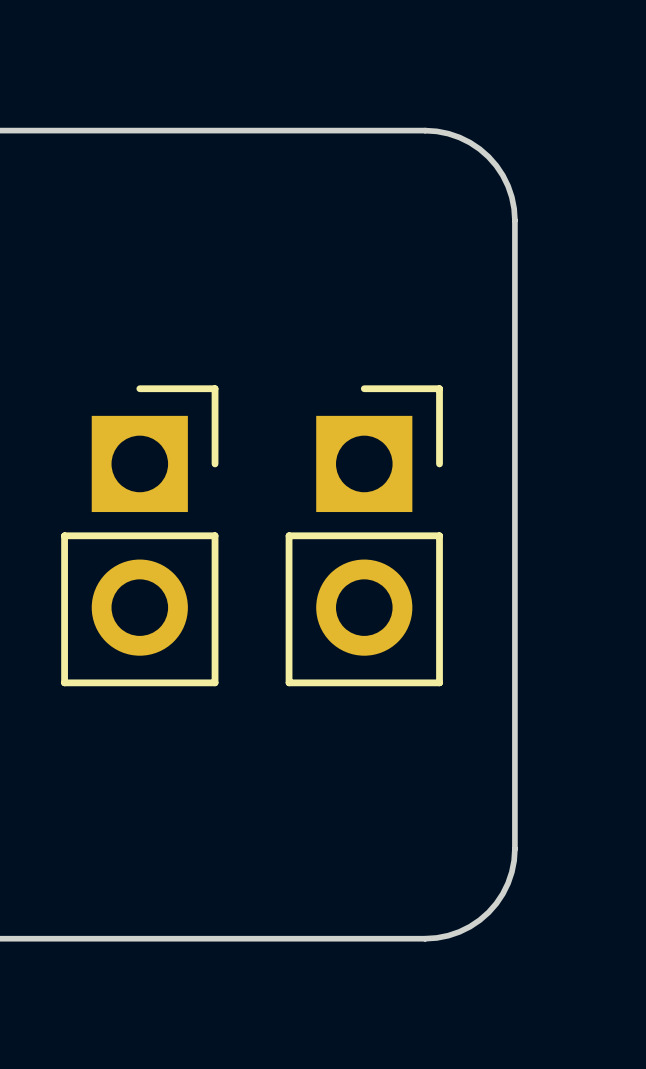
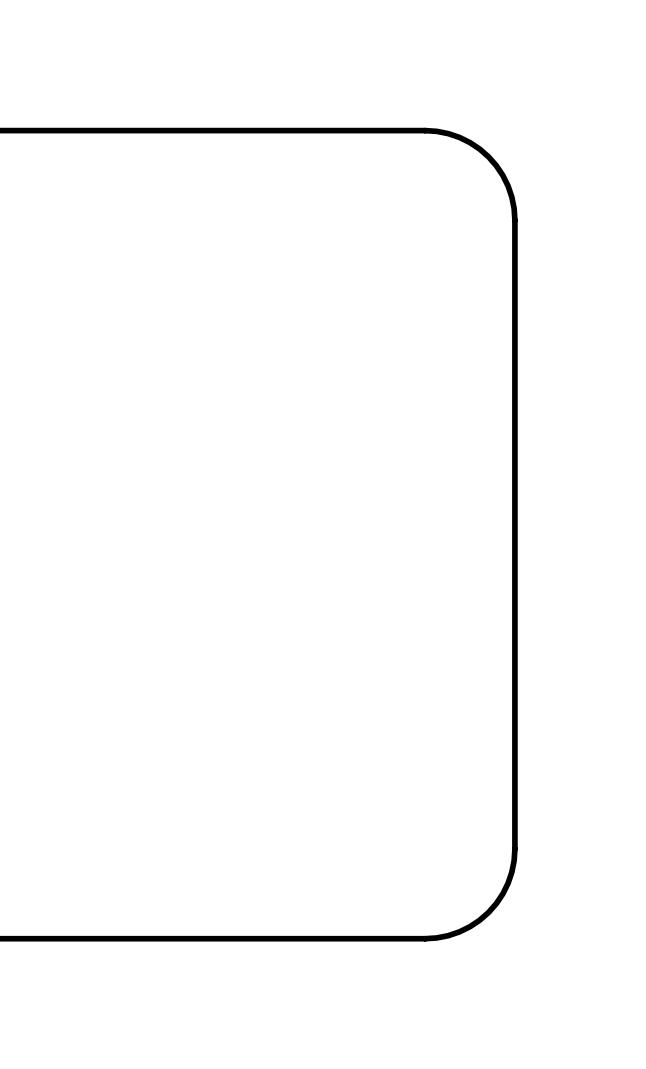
part: (139, 535) -> none
part: (364, 535) -> none

